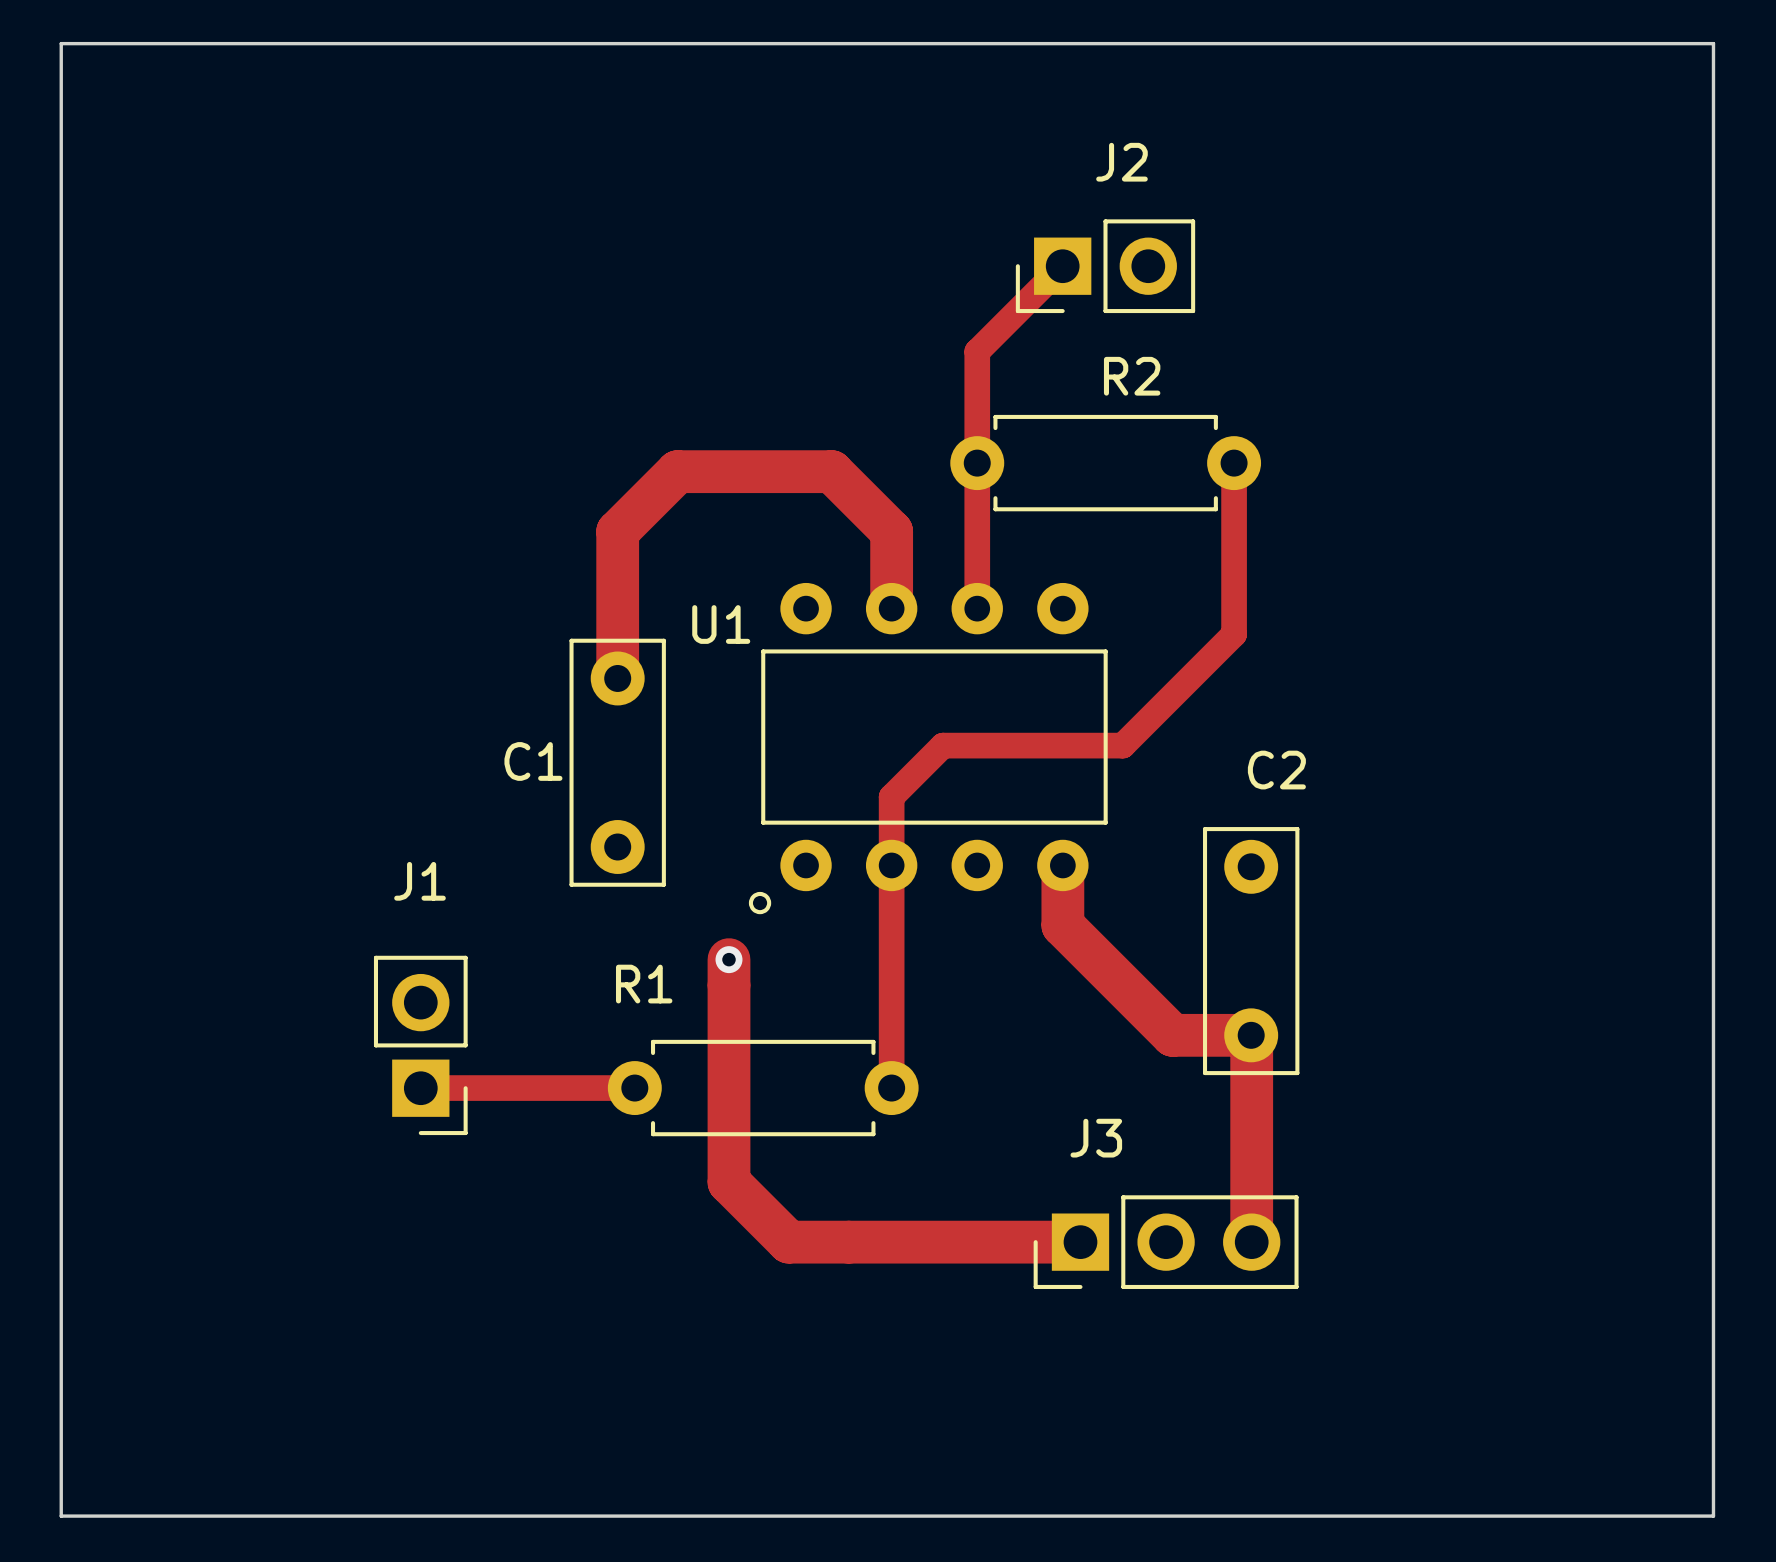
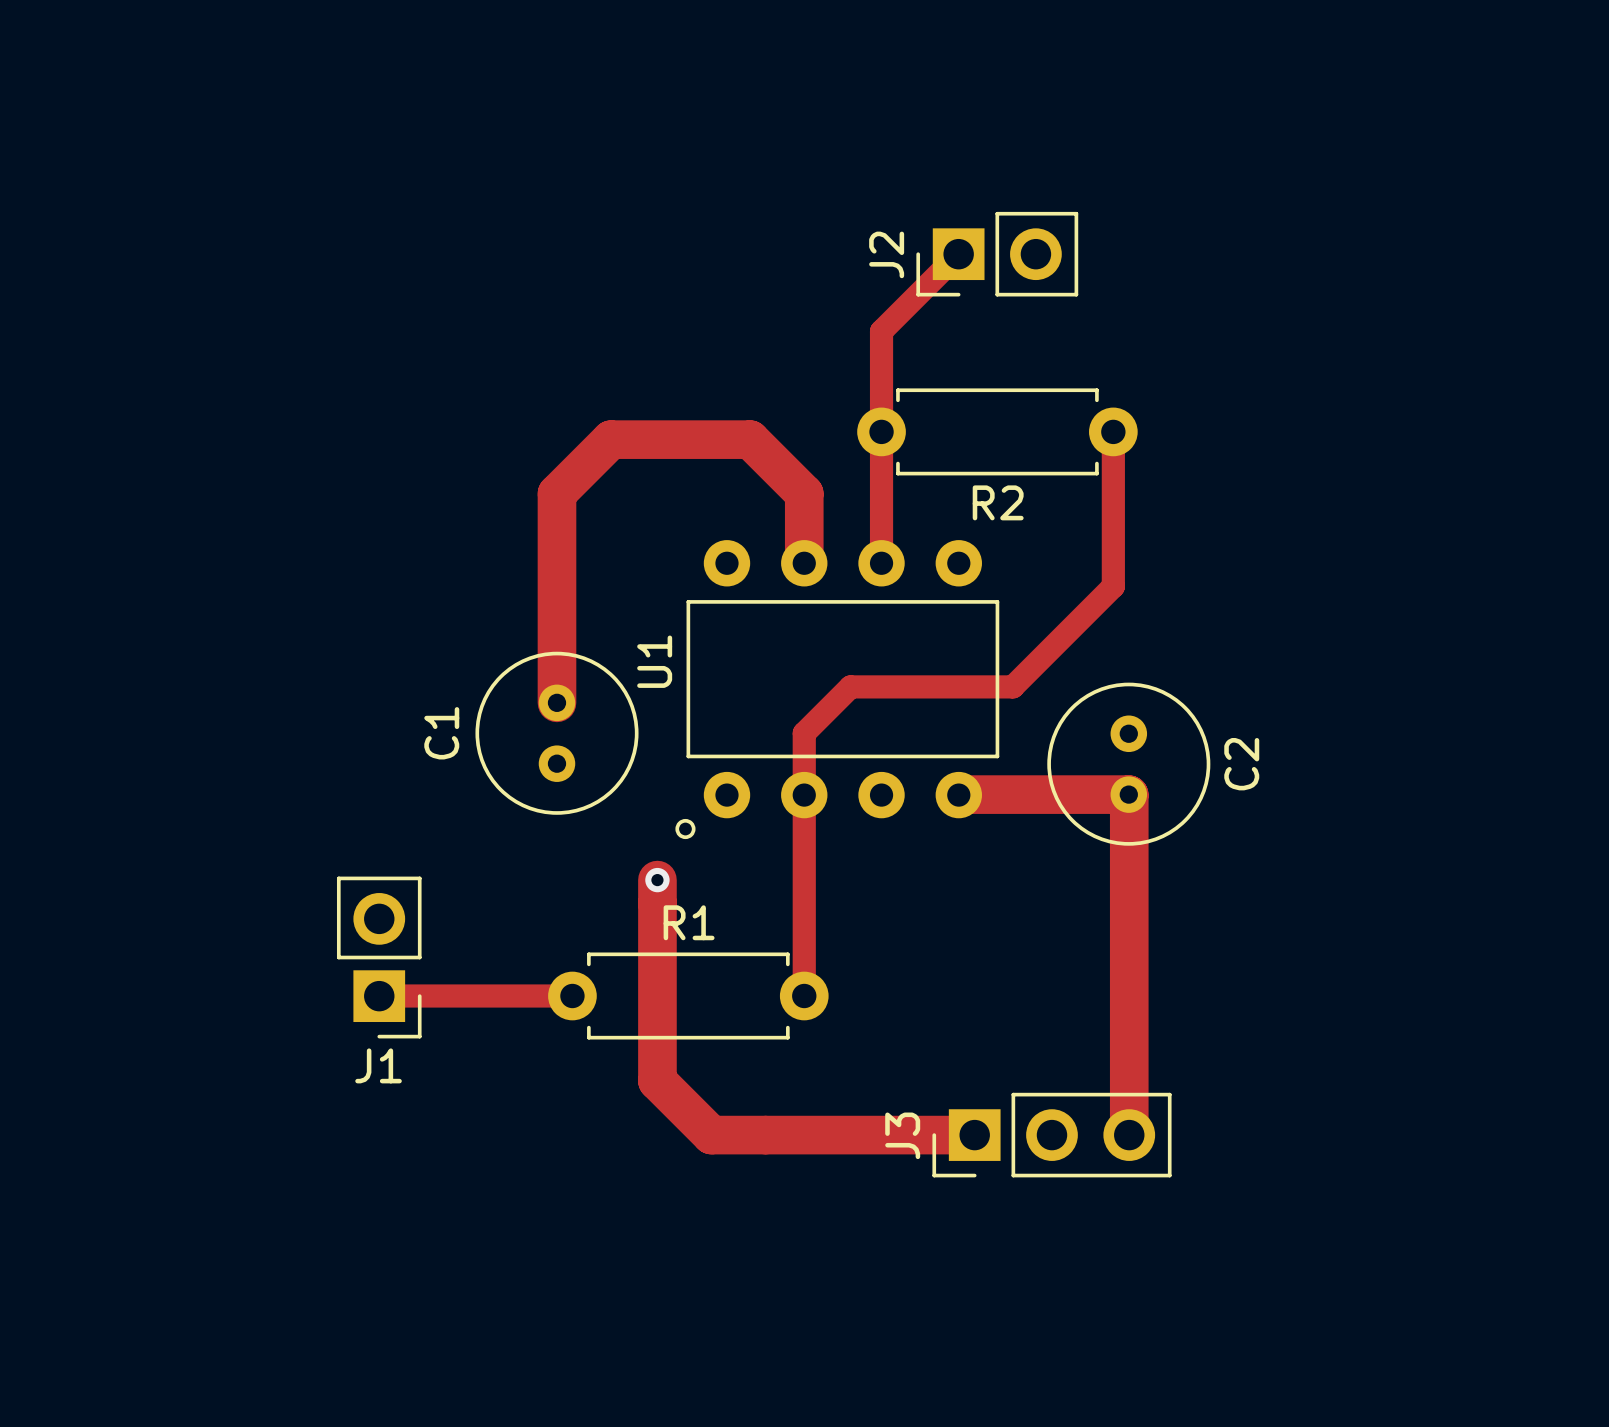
board edge: (61, 43) (1713, 43) (1713, 1516) (61, 1516) (61, 43) -> none
J2 name rotation: 0° (1121, 162) -> 90° counterclockwise (886, 254)
J2 name position: J2 (1121, 162) -> J2 (886, 254)
R2 name position: R2 (1132, 376) -> R2 (998, 502)
U1 name rotation: 0° (721, 624) -> 90° counterclockwise (654, 661)
U1 name position: U1 (721, 624) -> U1 (654, 661)
C1 footprint: [569, 638, 666, 887] -> [475, 651, 639, 815]
track: none -> (556, 626) (556, 702)
C2 name position: C2 (1276, 770) -> C2 (1241, 764)
C2 footprint: [1203, 827, 1300, 1076] -> [1047, 682, 1211, 846]
track: (1062, 865) (1062, 925) (1172, 1035) (1251, 1035) -> (959, 794) (1128, 794) (1129, 948)
J1 name position: J1 (420, 881) -> J1 (378, 1065)
R1 name position: R1 (644, 984) -> R1 (689, 922)
J3 name rotation: 0° (1096, 1138) -> 90° counterclockwise (902, 1135)
J3 name position: J3 (1096, 1138) -> J3 (902, 1135)

